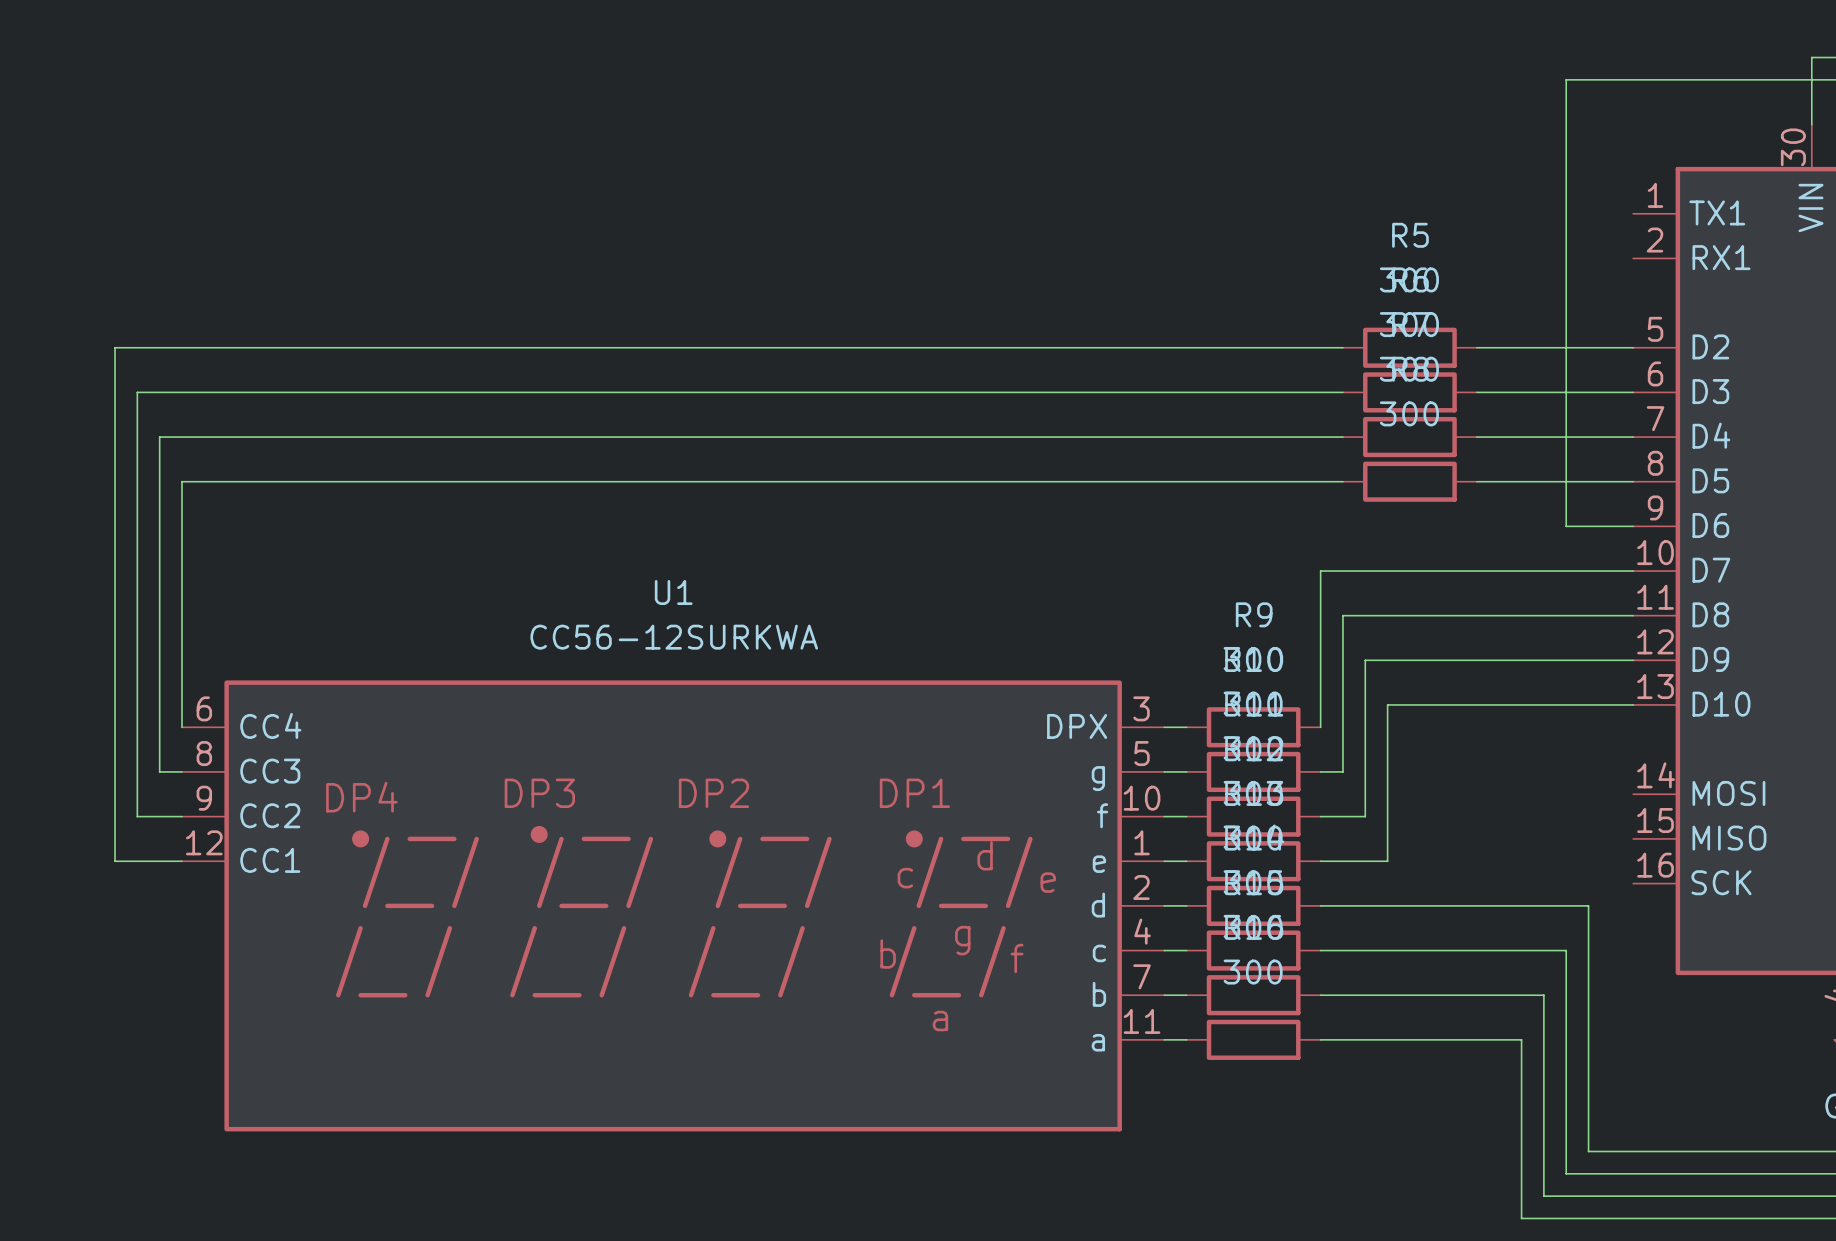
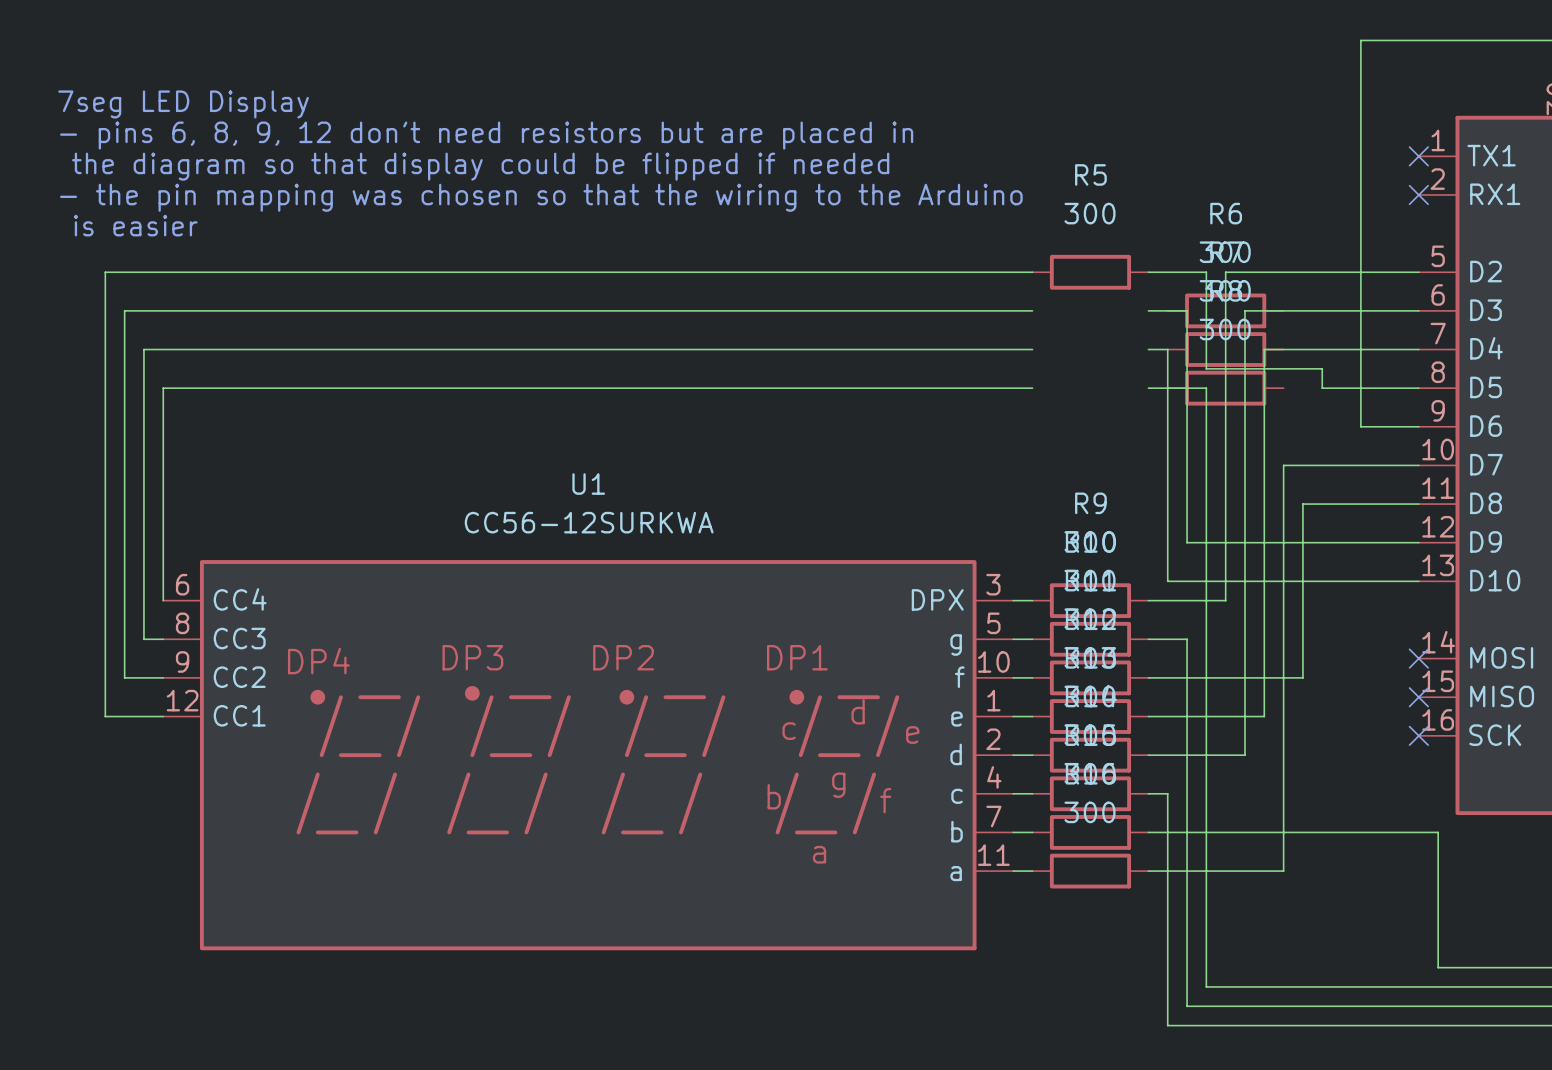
text: none -> 7seg LED Display (183, 104)
text: none -> - pins 6, 8, 9, 12 don't need resistors but are placed in (486, 135)
no-connect mark: none -> (1418, 156)
text: none -> the diagram so that display could be flipped if needed (480, 166)
no-connect mark: none -> (1418, 194)
text: none -> - the pin mapping was chosen so that the wiring to the Arduino (541, 197)
text: none -> is easier (135, 225)
wire: (1186, 347) (1320, 347) -> none
R5 position: (1409, 347) -> (1090, 272)
wire: (1186, 392) (1320, 392) -> none
wire: (1186, 437) (1320, 437) -> none
wire: none -> (1283, 349) (1264, 349) (1264, 716) (1206, 716) (1206, 986) (1360, 986)
wire: (1186, 481) (1320, 481) -> none
wire: none -> (1167, 388) (1206, 388) (1206, 581) (1167, 581)
wire: (1476, 481) (1521, 481) -> (1167, 272) (1206, 272) (1206, 368) (1322, 368) (1322, 388)
wire: (1476, 571) (1320, 571) (1320, 727) -> (1283, 272) (1225, 272) (1225, 600) (1148, 600)
wire: (1342, 615) (1499, 615) -> (1167, 504) (1167, 349)
wire: none -> (1302, 504) (1302, 677) (1187, 677) (1187, 1006) (1341, 1006)
wire: (1365, 660) (1365, 771) -> (1187, 542) (1187, 310) (1167, 310)
wire: (1342, 704) (1342, 771) -> (1187, 639) (1167, 639)
no-connect mark: none -> (1418, 658)
no-connect mark: none -> (1418, 697)
no-connect mark: none -> (1418, 735)
wire: (1432, 905) (1588, 905) (1588, 1151) (1655, 1151) -> (1244, 755) (1244, 310) (1283, 310)
wire: (1342, 950) (1566, 950) (1566, 1173) -> (1167, 793) (1167, 1025) (1322, 1025)
wire: (1543, 995) (1543, 1196) -> (1341, 832) (1438, 832) (1438, 967)
wire: (1476, 1039) (1521, 1039) (1521, 1218) -> (1283, 871) (1283, 465)

